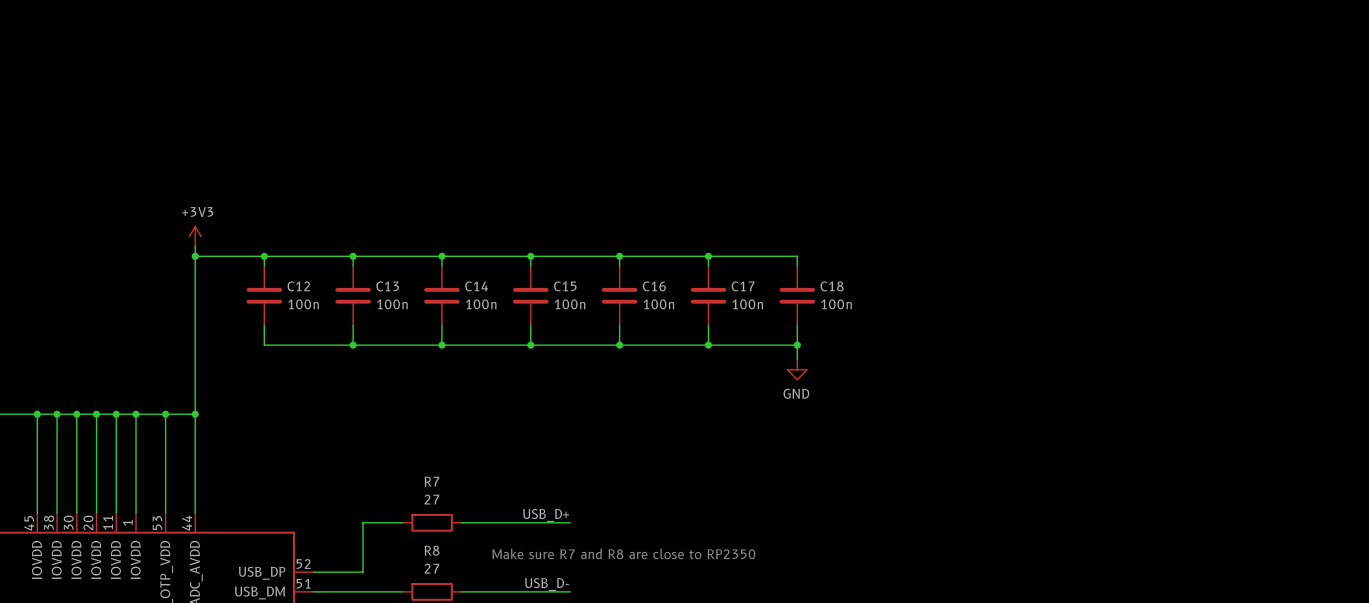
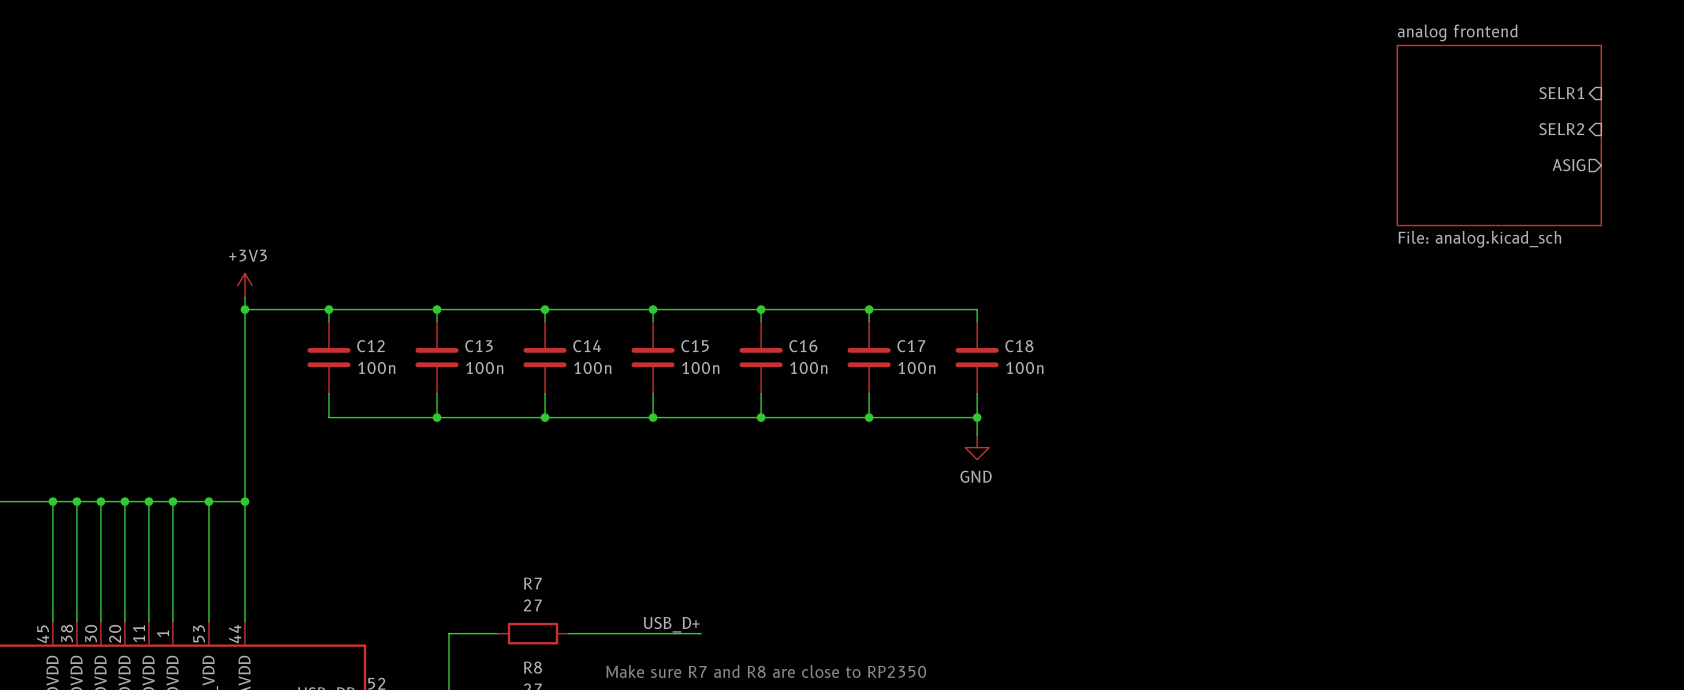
sheet pin: none -> SELR1 (1561, 93)
sheet pin: none -> SELR2 (1561, 129)
sheet analog frontend: none -> File: analog.kicad_sch (1499, 135)
sheet pin: none -> ASIG (1568, 165)

